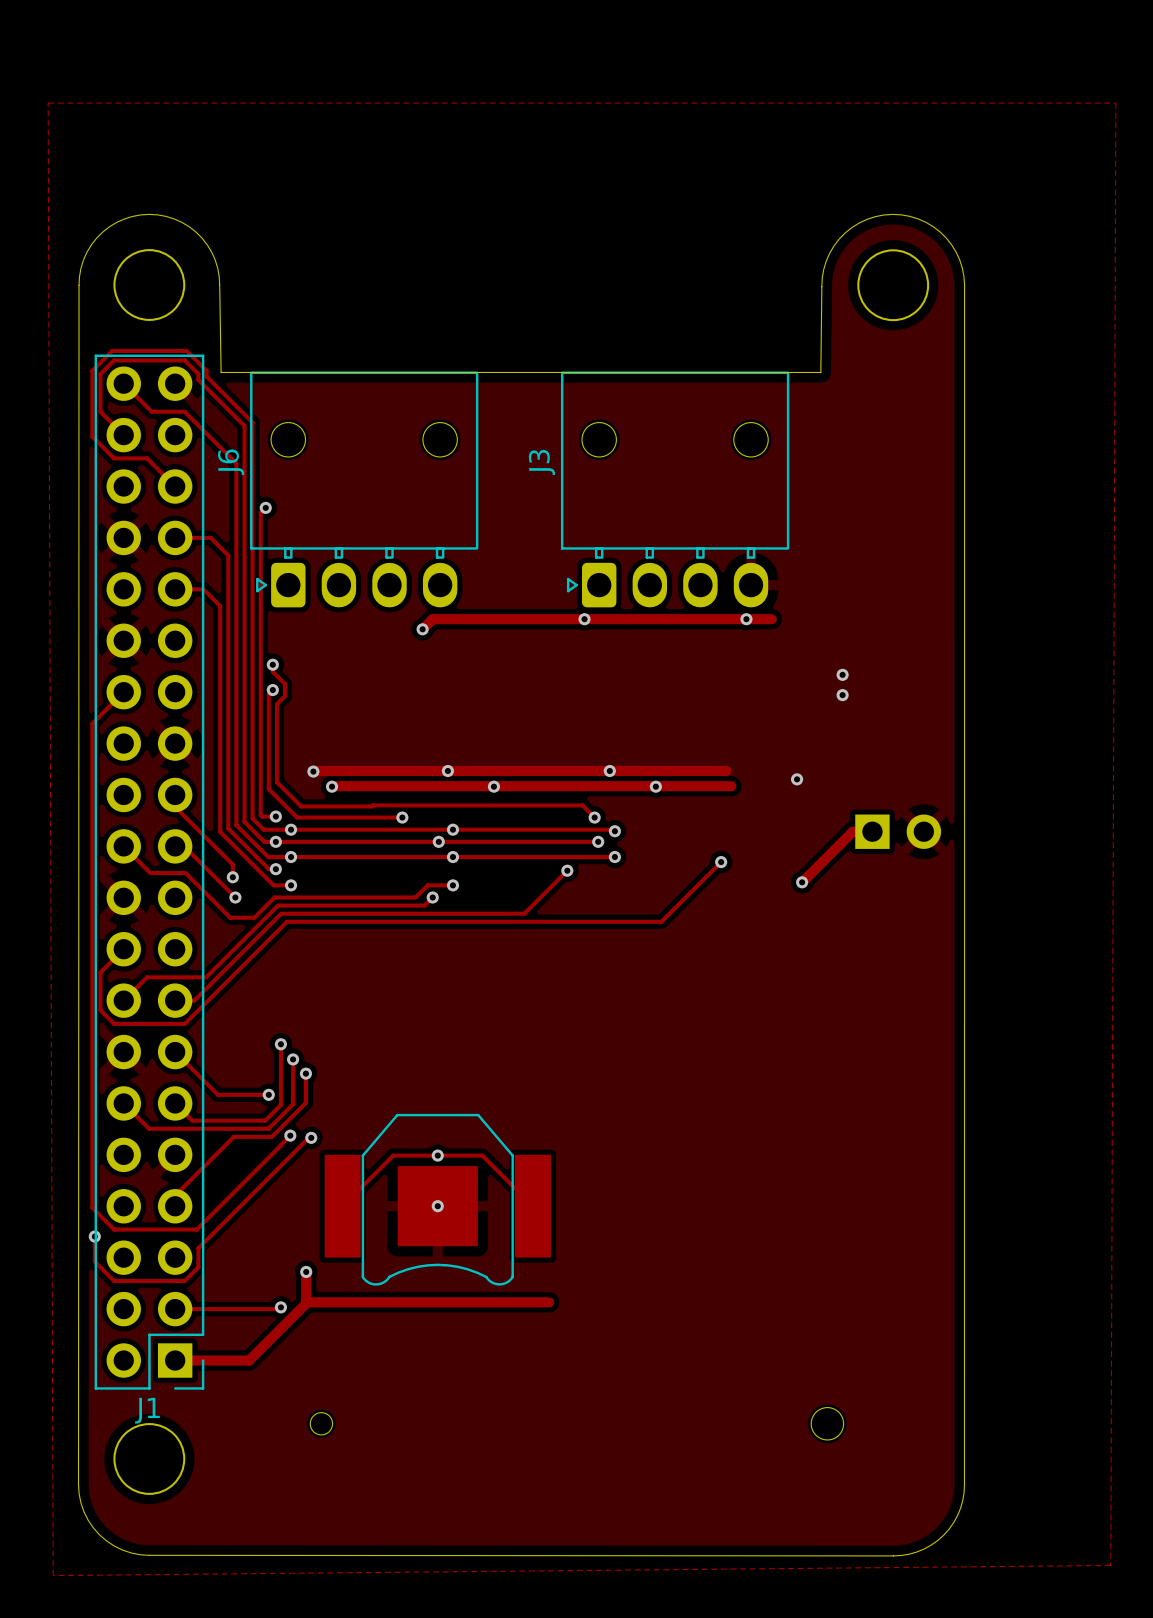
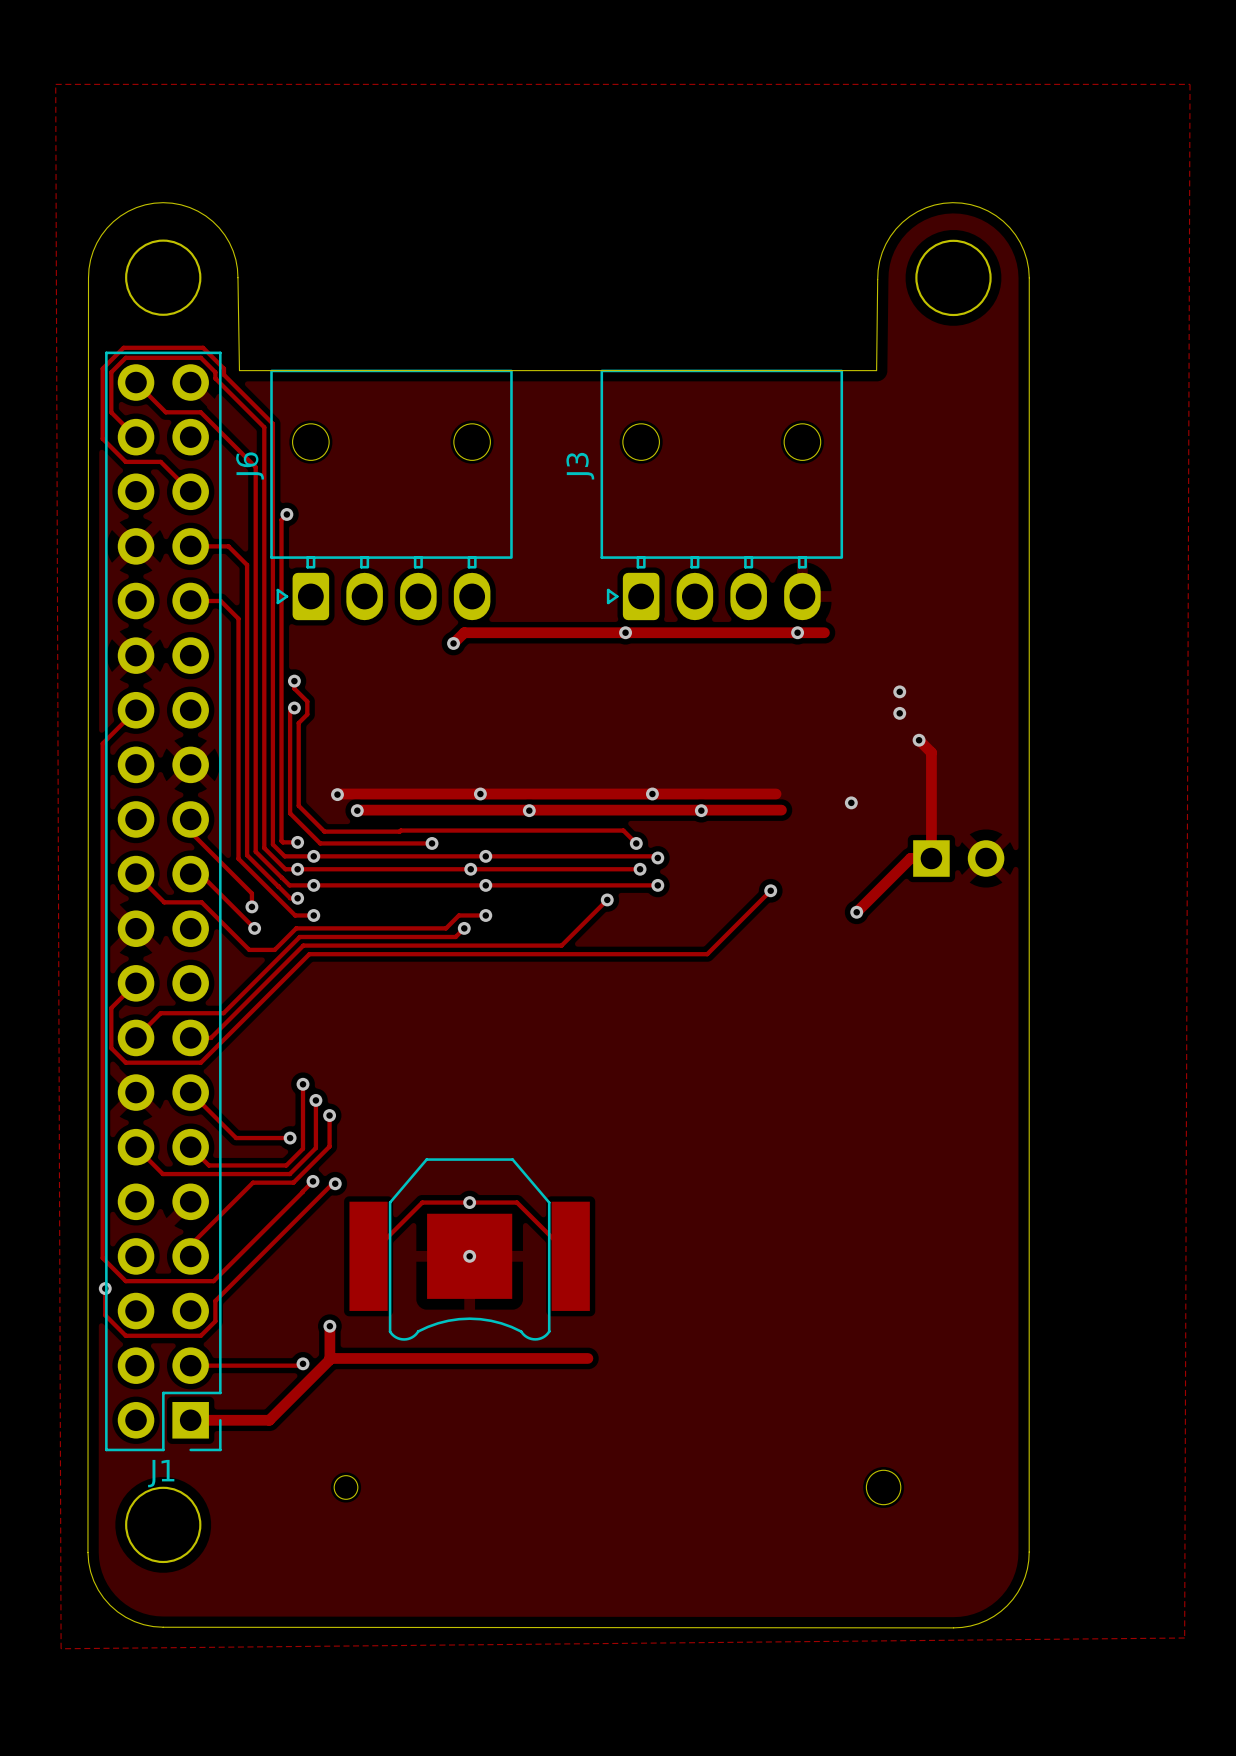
track: none -> (919, 740) (931, 752) (931, 858)
via: none -> (919, 740)

